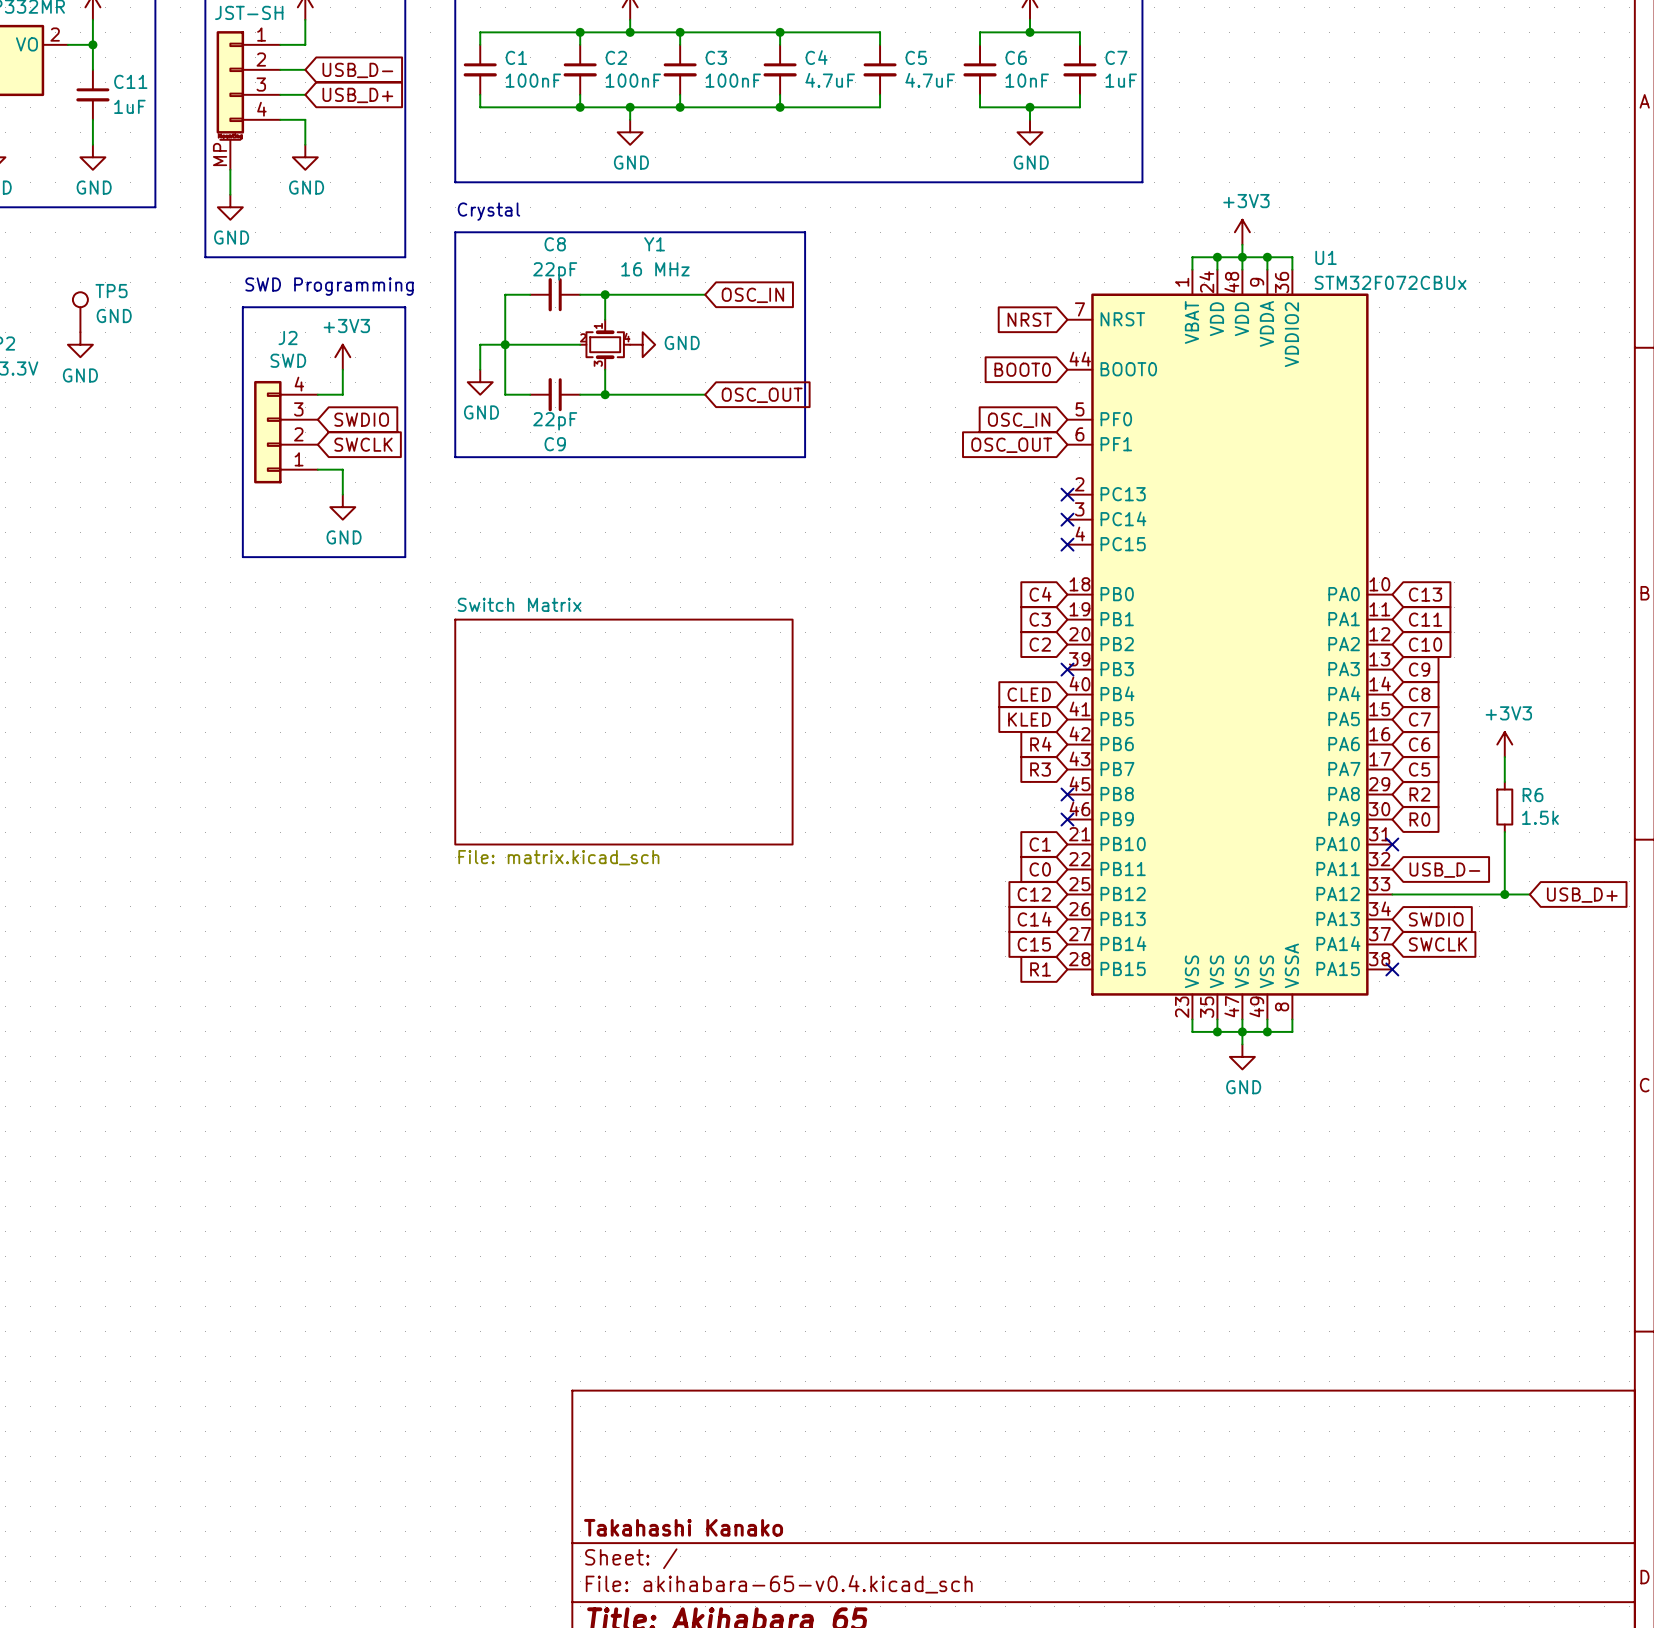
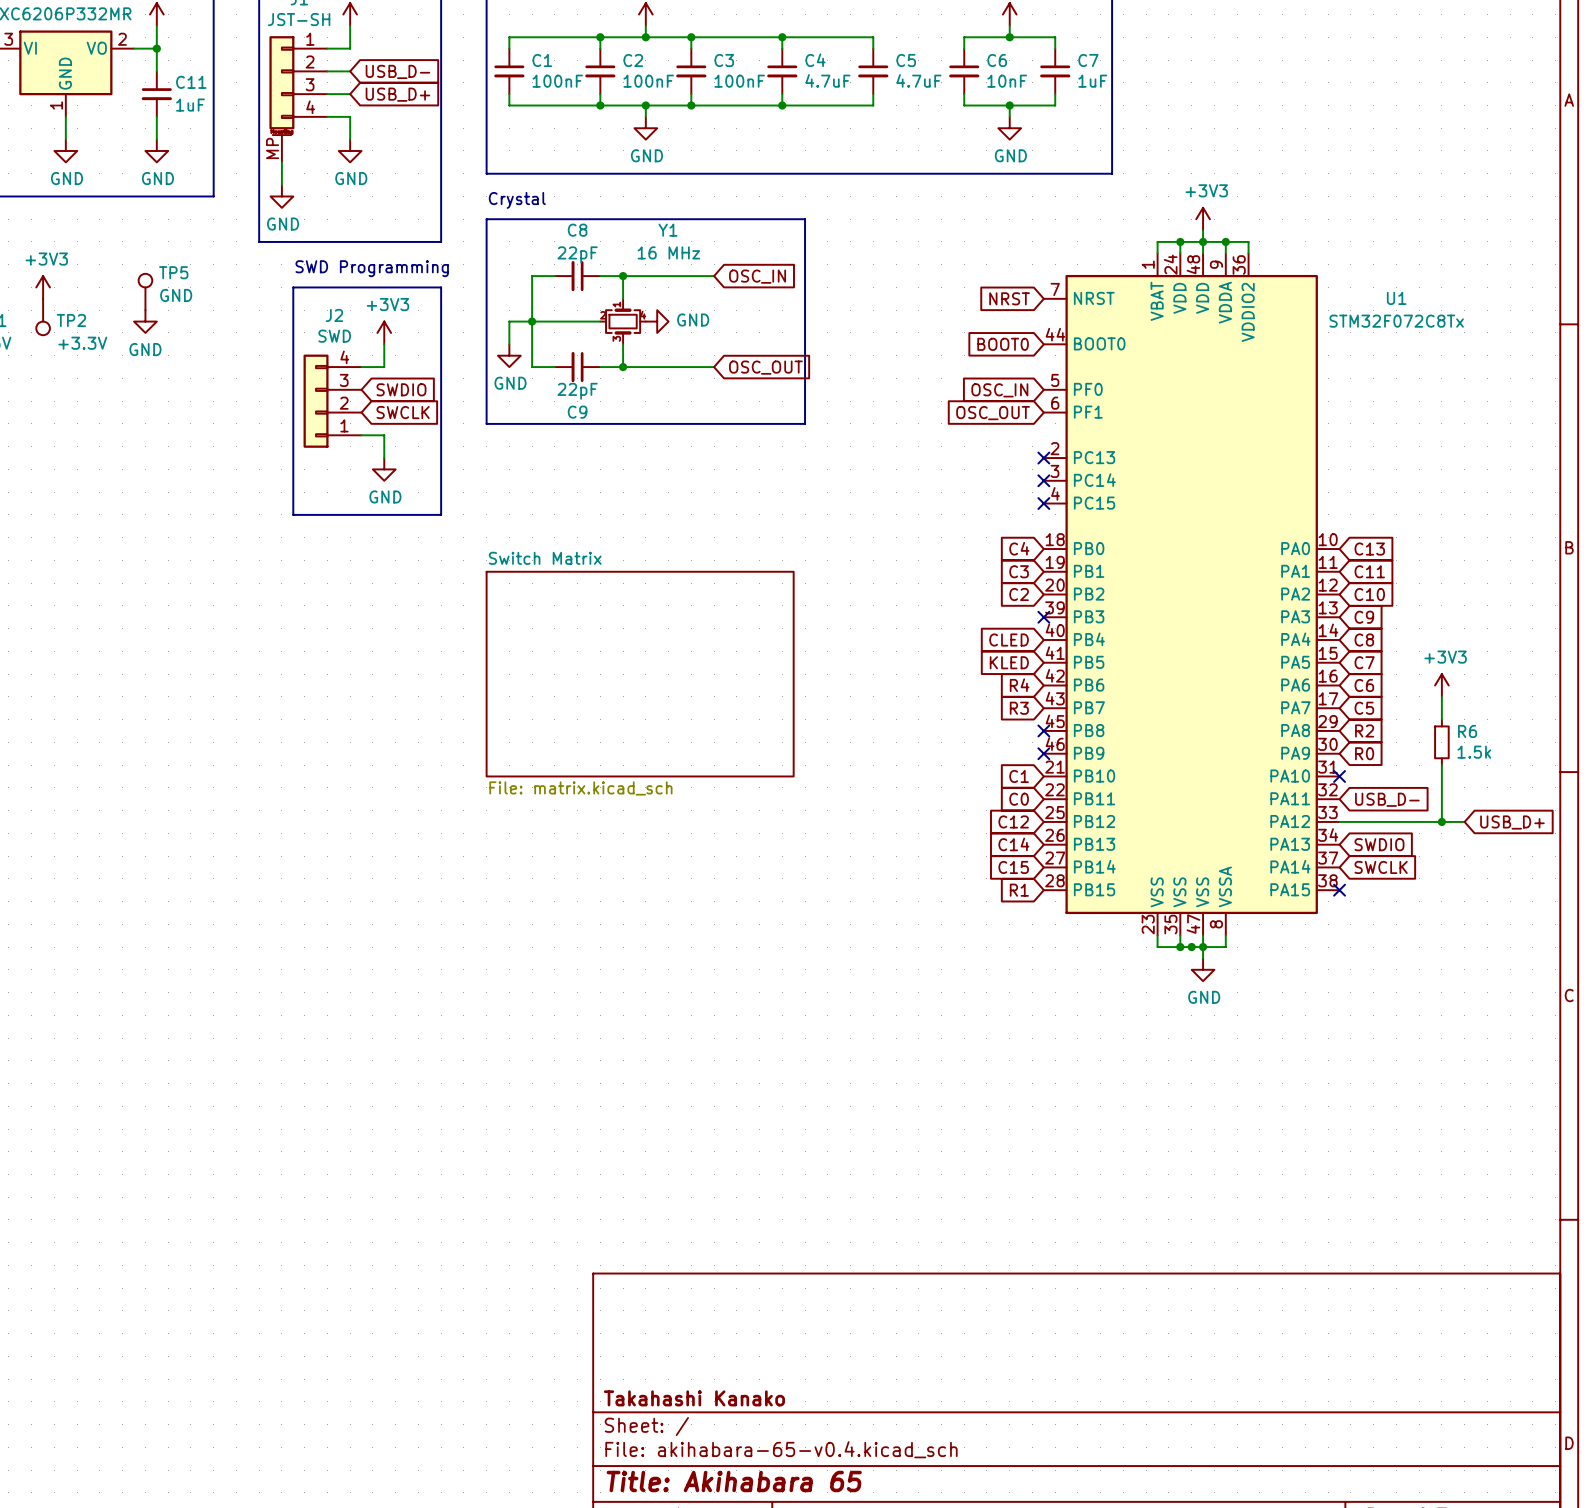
U1 name position: U1 (1326, 257) -> U1 (1396, 298)
U1 symbol: [1067, 269, 1393, 1020] -> [1043, 253, 1340, 936]
U1 value: STM32F072CBUx (1390, 282) -> STM32F072C8Tx (1396, 321)
wire: (1292, 1019) (1292, 1031) (1267, 1031) -> none
junction position: (1267, 1031) -> (1191, 947)

